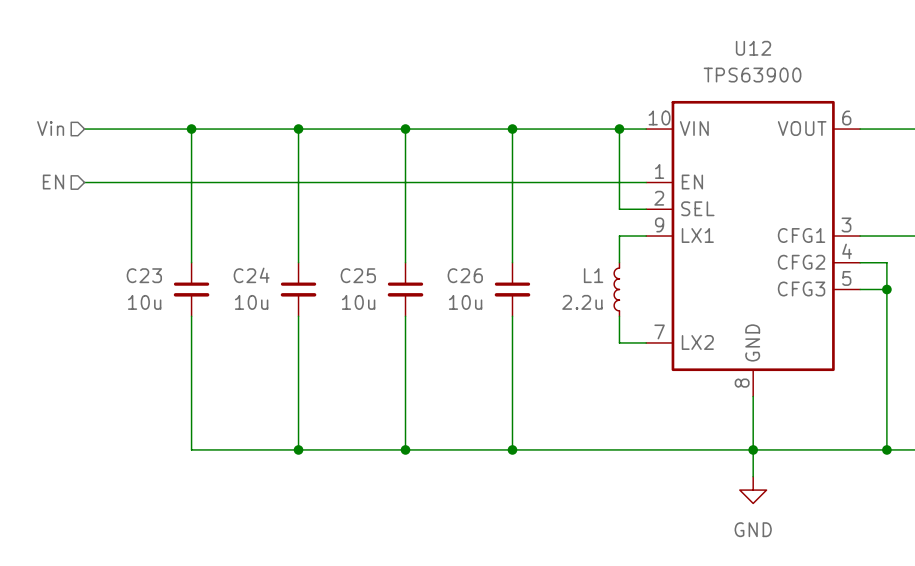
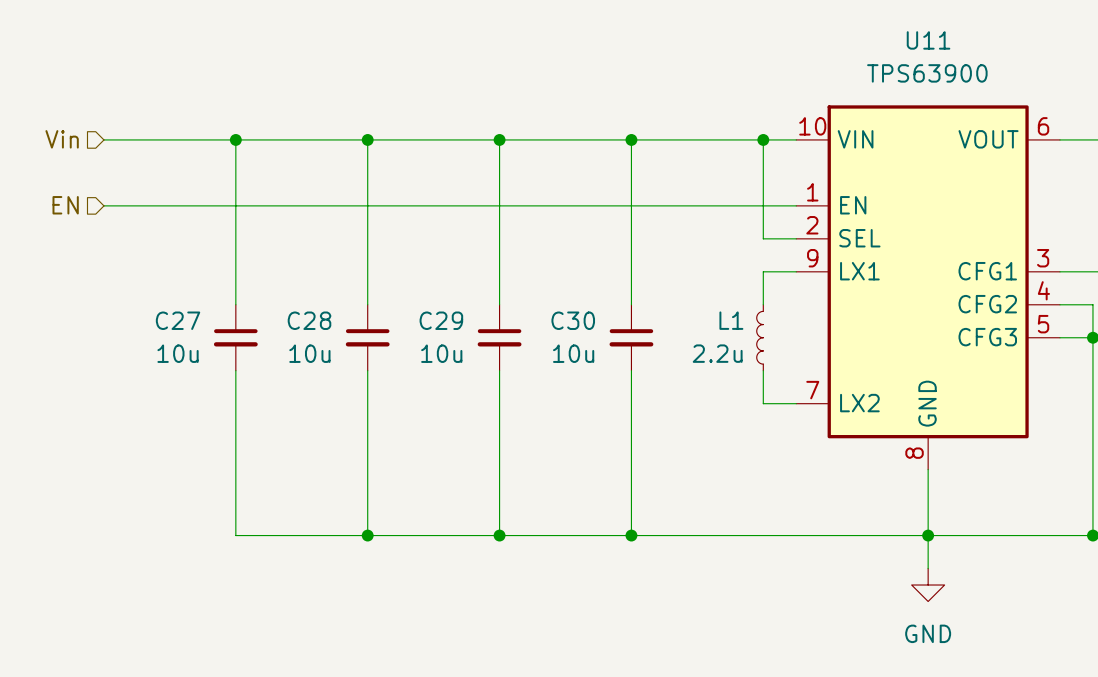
U12 name: U12 (753, 48) -> U11 (928, 40)
C23 name: C23 (144, 275) -> C27 (178, 320)
C24 name: C24 (251, 275) -> C28 (309, 320)
C25 name: C25 (358, 275) -> C29 (441, 320)
C26 name: C26 (465, 275) -> C30 (573, 320)

